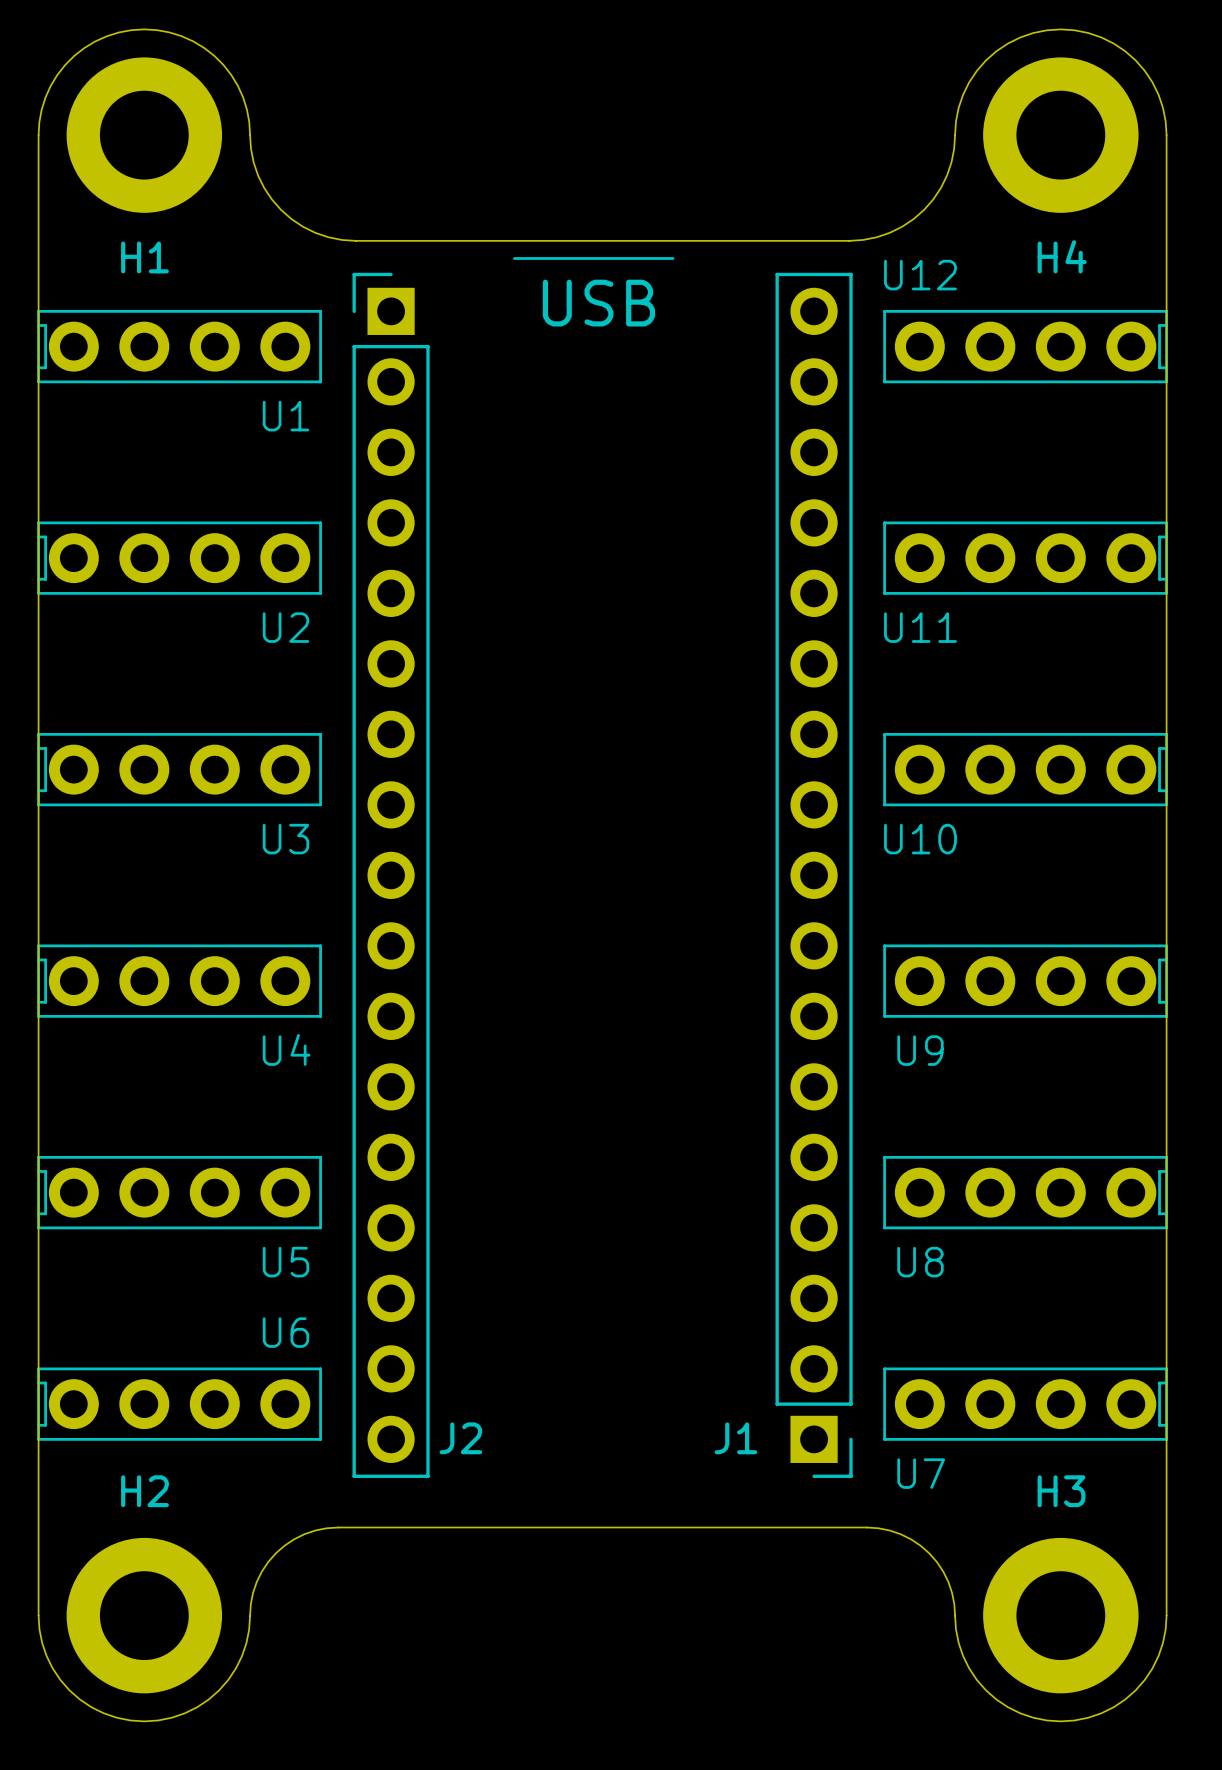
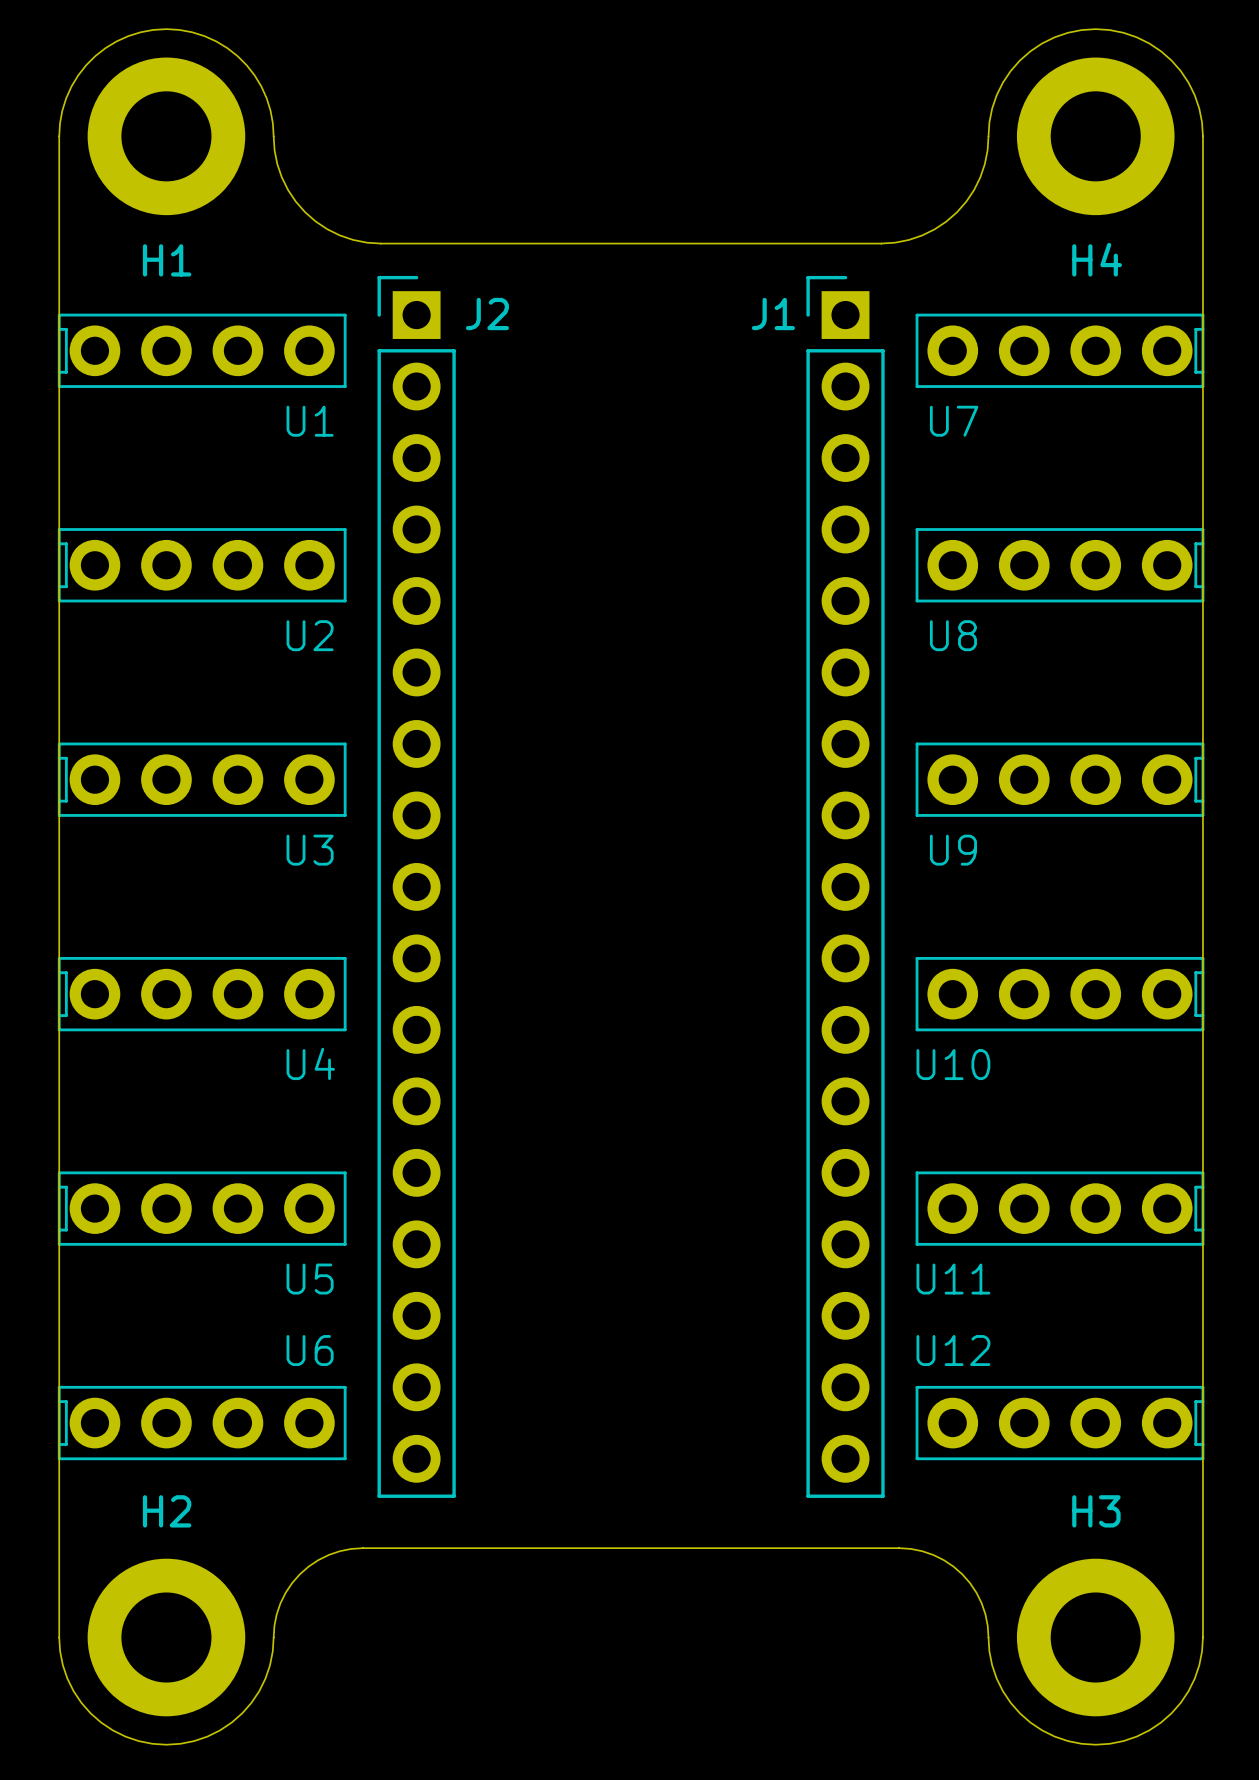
line: (514, 258) (673, 258) -> none
U12 name: U12 (920, 275) -> U7 (954, 421)
text: USB (598, 303) -> none
U11 name: U11 (920, 627) -> U8 (953, 635)
U10 name: U10 (920, 839) -> U9 (953, 850)
J1 rotation: 0° (814, 875) -> 180° (845, 886)
U9 name: U9 (920, 1050) -> U10 (953, 1064)
U8 name: U8 (920, 1262) -> U11 (953, 1279)
J2 name position: J2 (460, 1438) -> J2 (487, 314)
J1 name position: J1 (735, 1438) -> J1 (773, 314)
U7 name: U7 (921, 1473) -> U12 (953, 1350)

